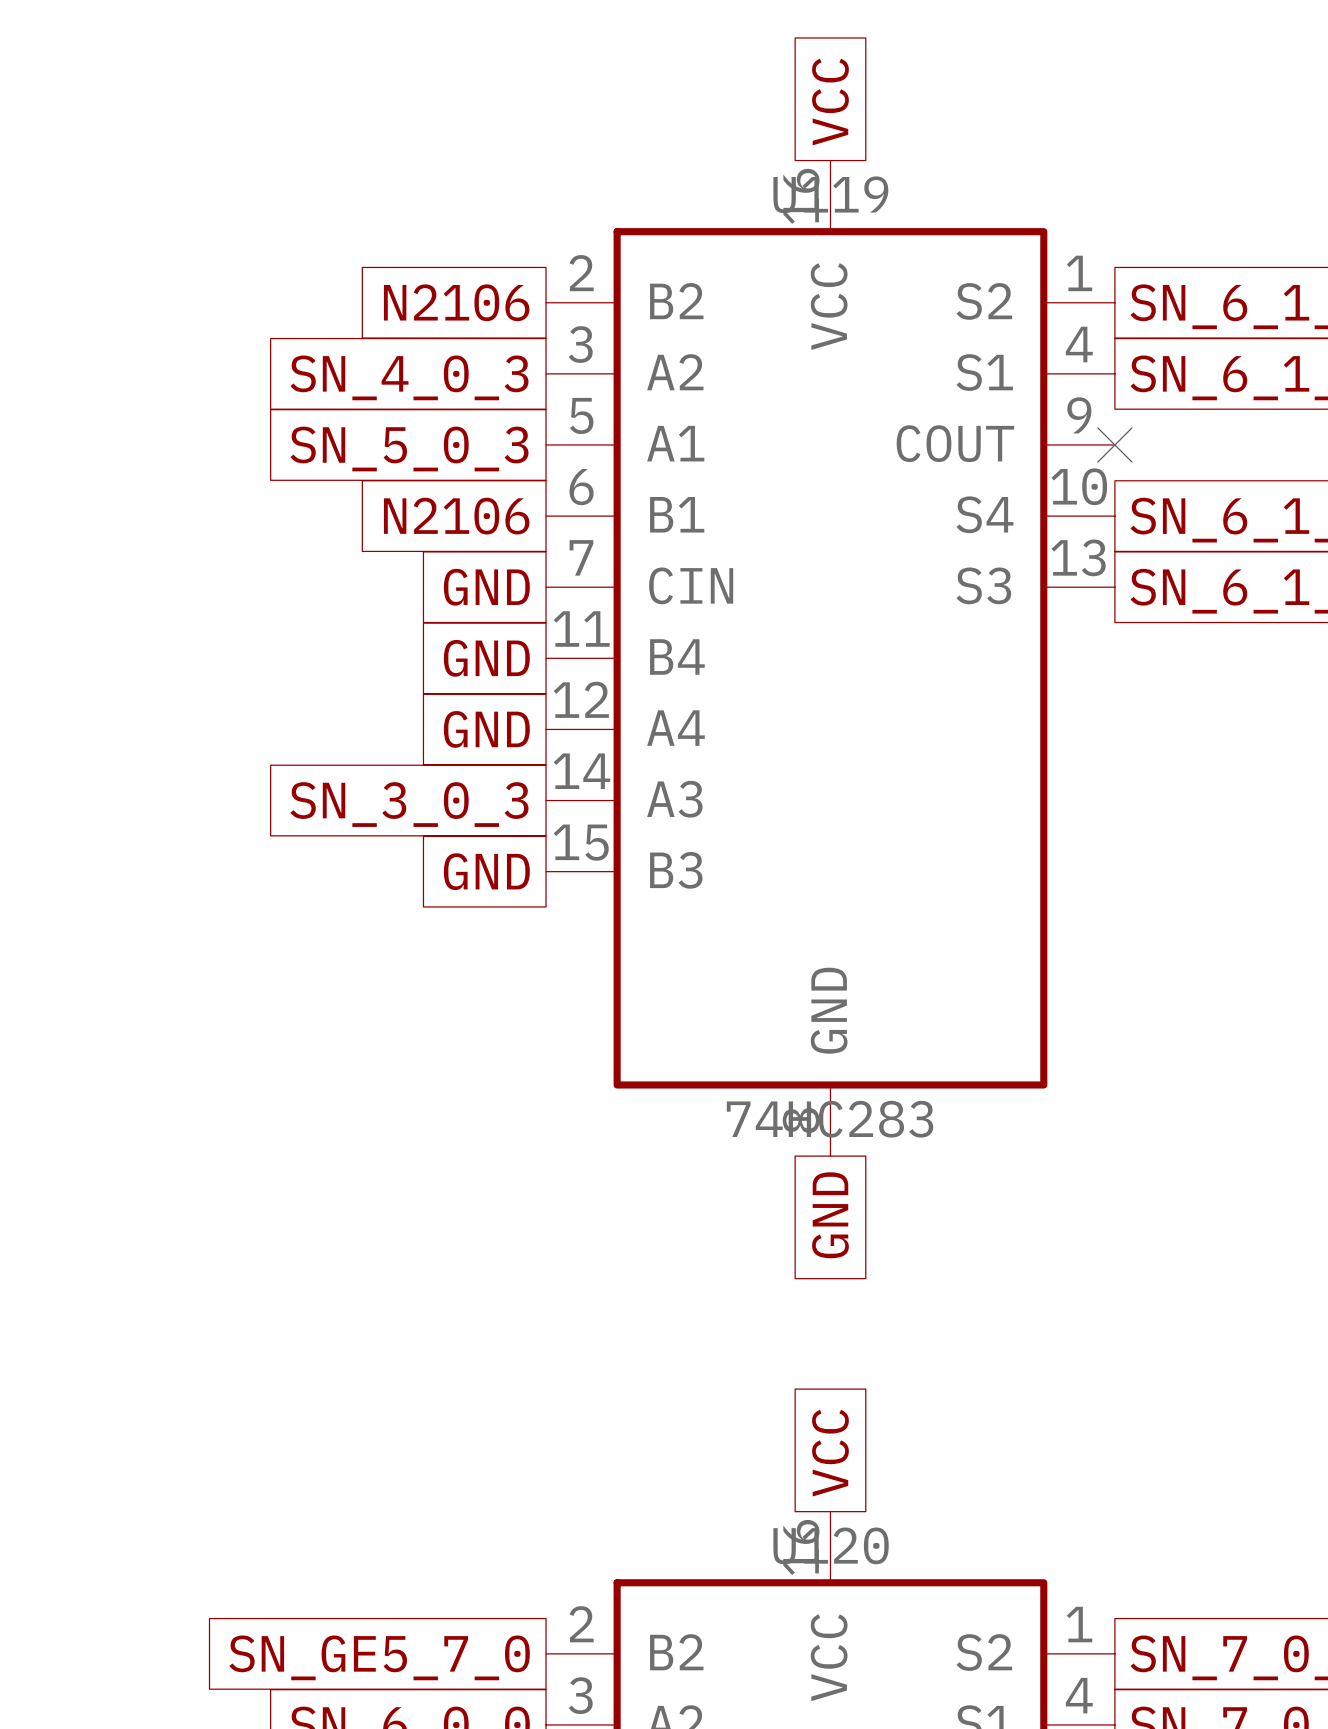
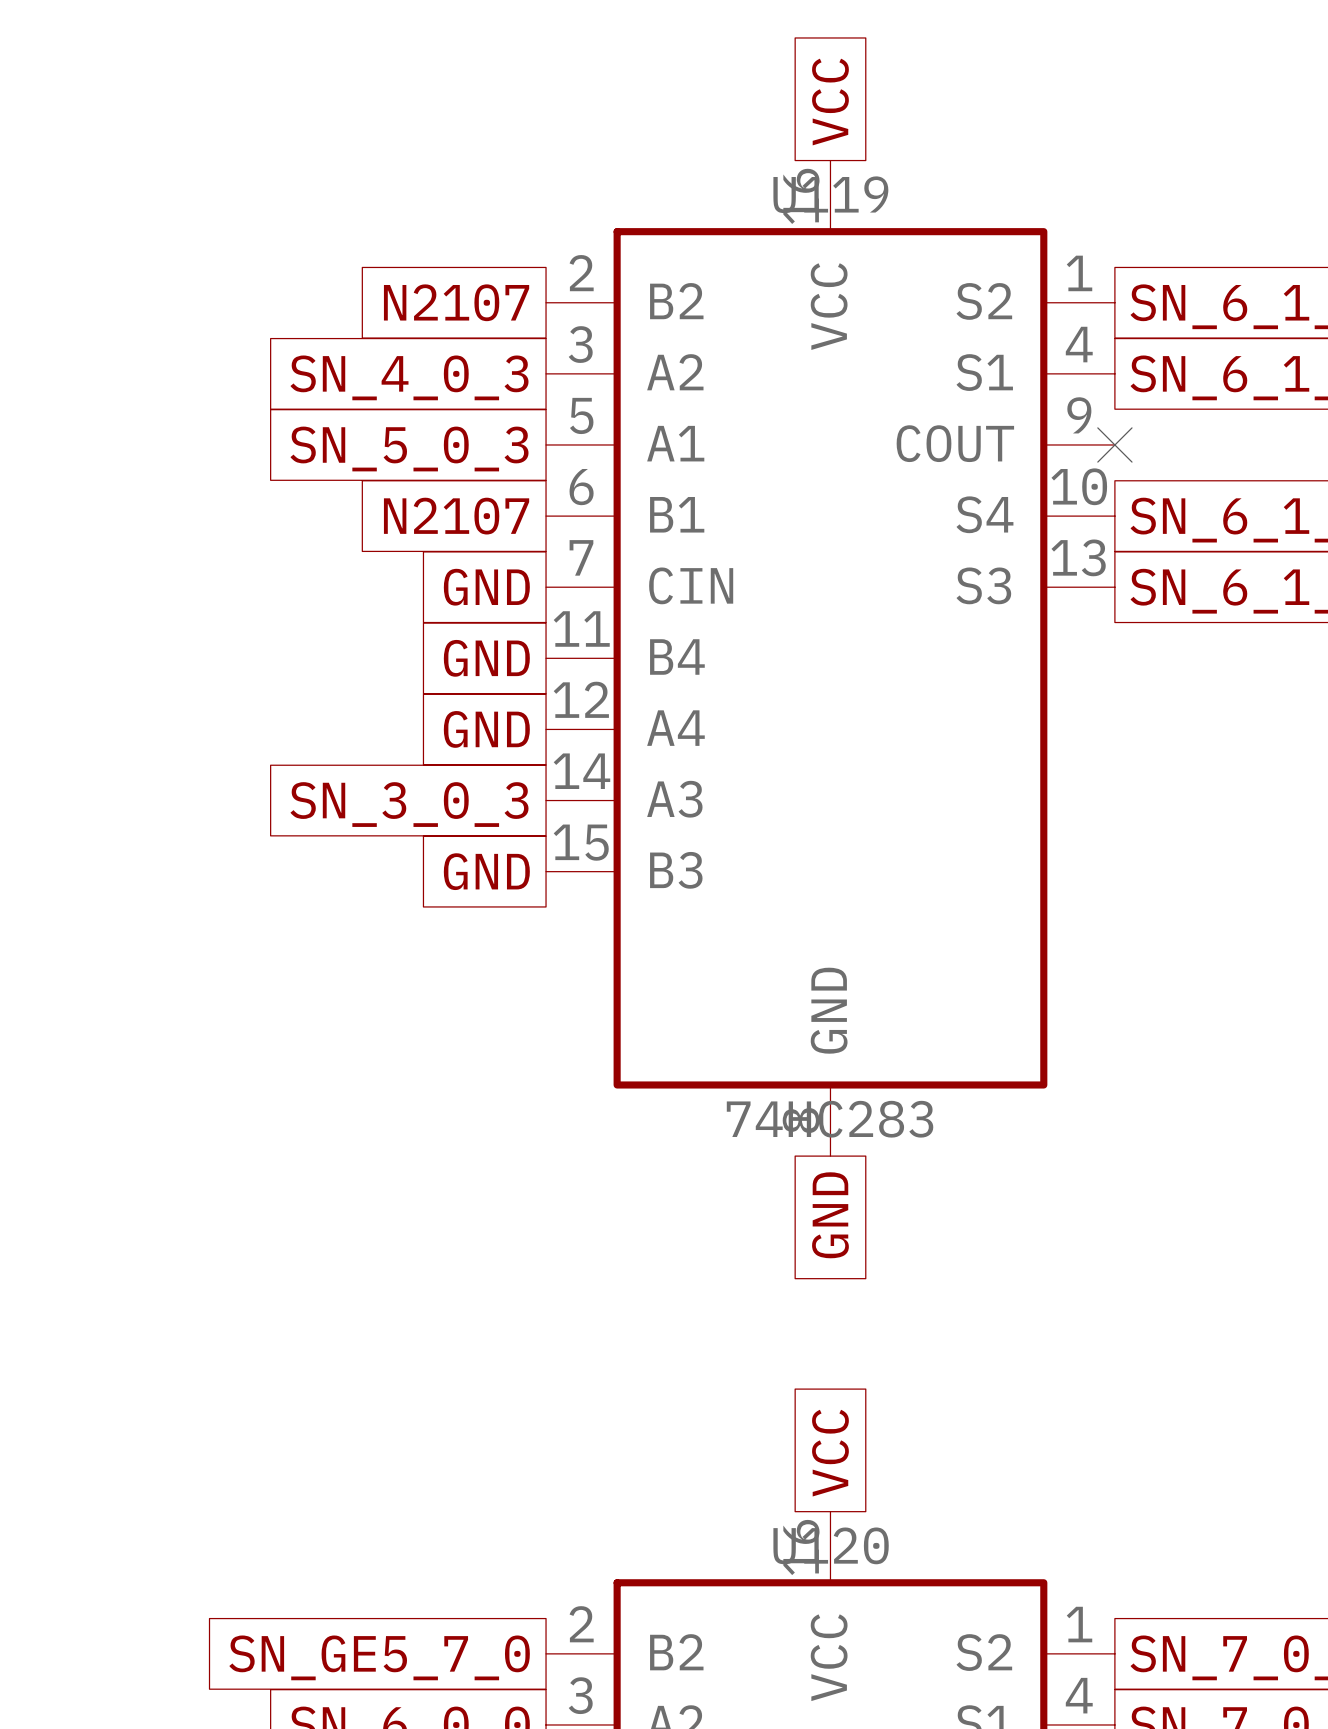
global label: N2106 (456, 302) -> N2107 (456, 302)
global label: N2106 (456, 516) -> N2107 (456, 516)

